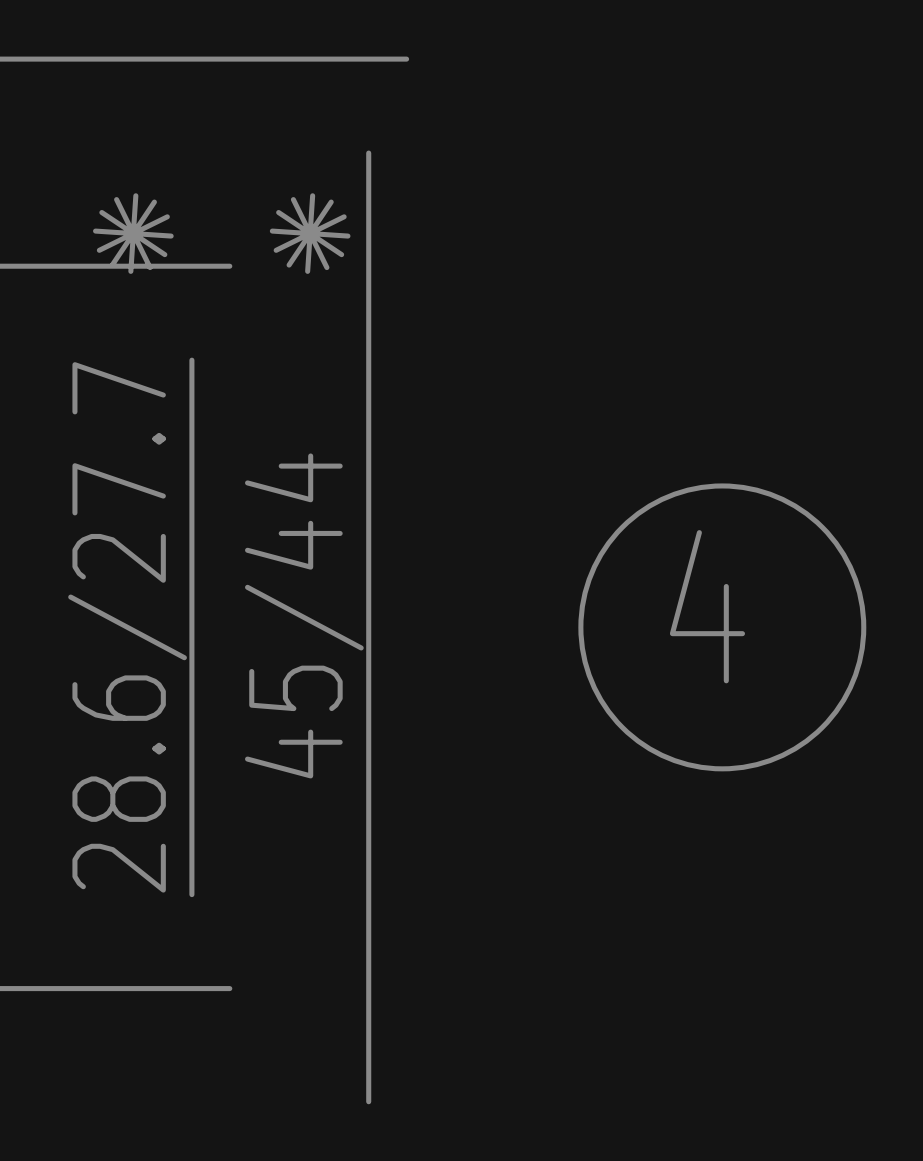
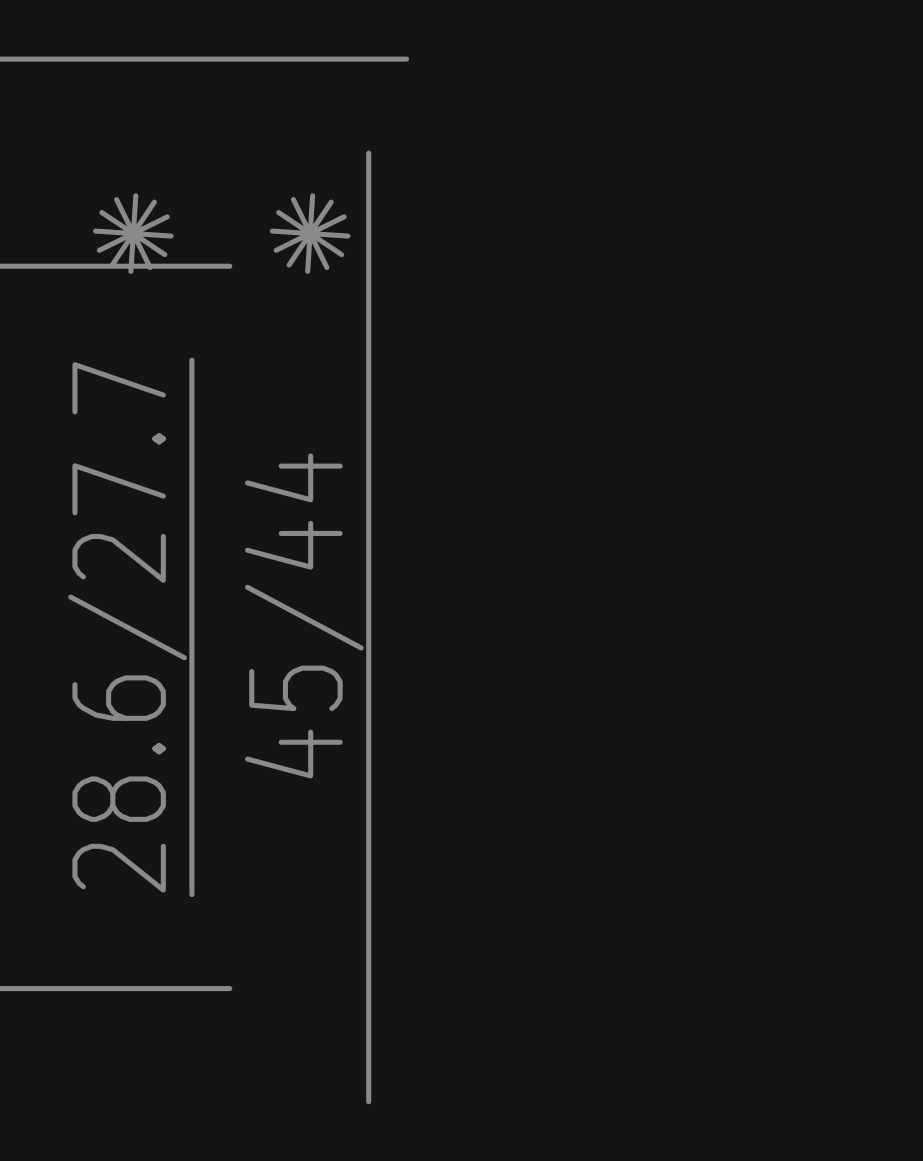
drawing: [578, 483, 867, 772] -> none
text: 4 (707, 606) -> none

